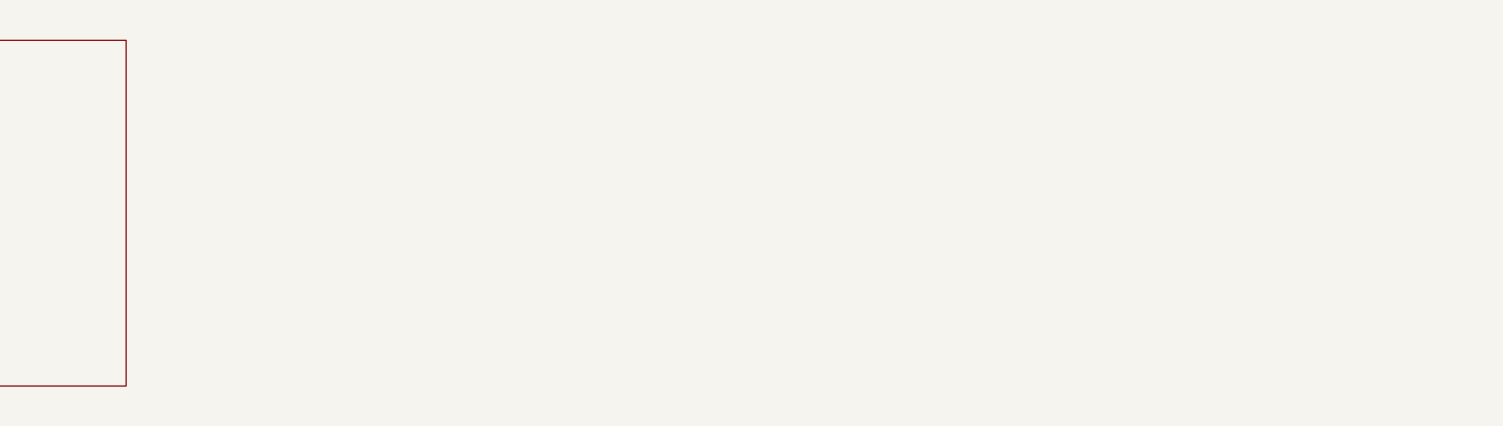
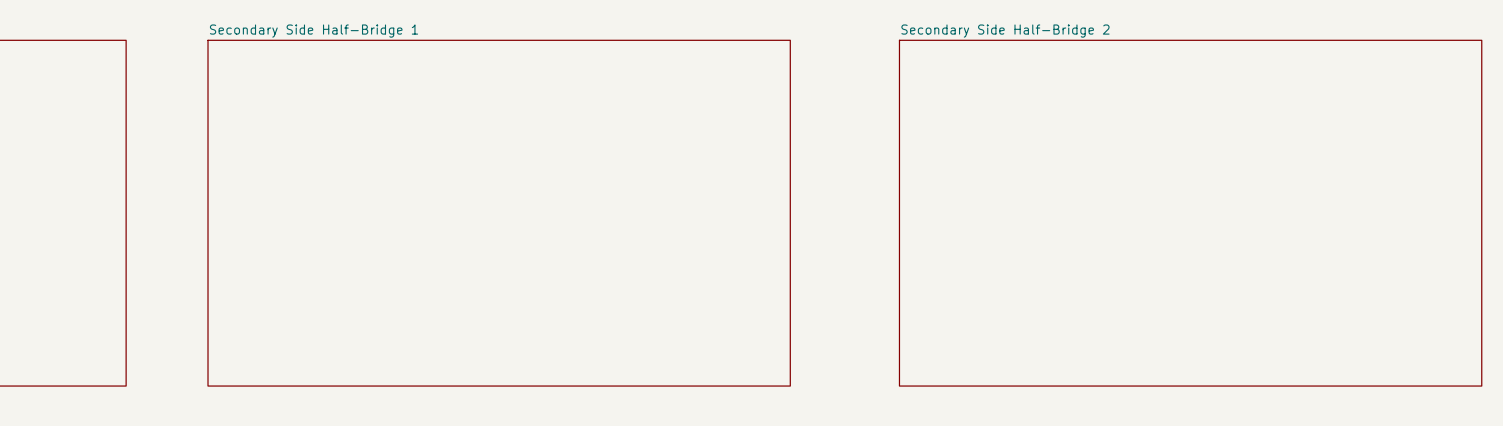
sheet Secondary Side Half-Bridge 1: none -> (499, 213)
sheet Secondary Side Half-Bridge 2: none -> (1190, 213)

